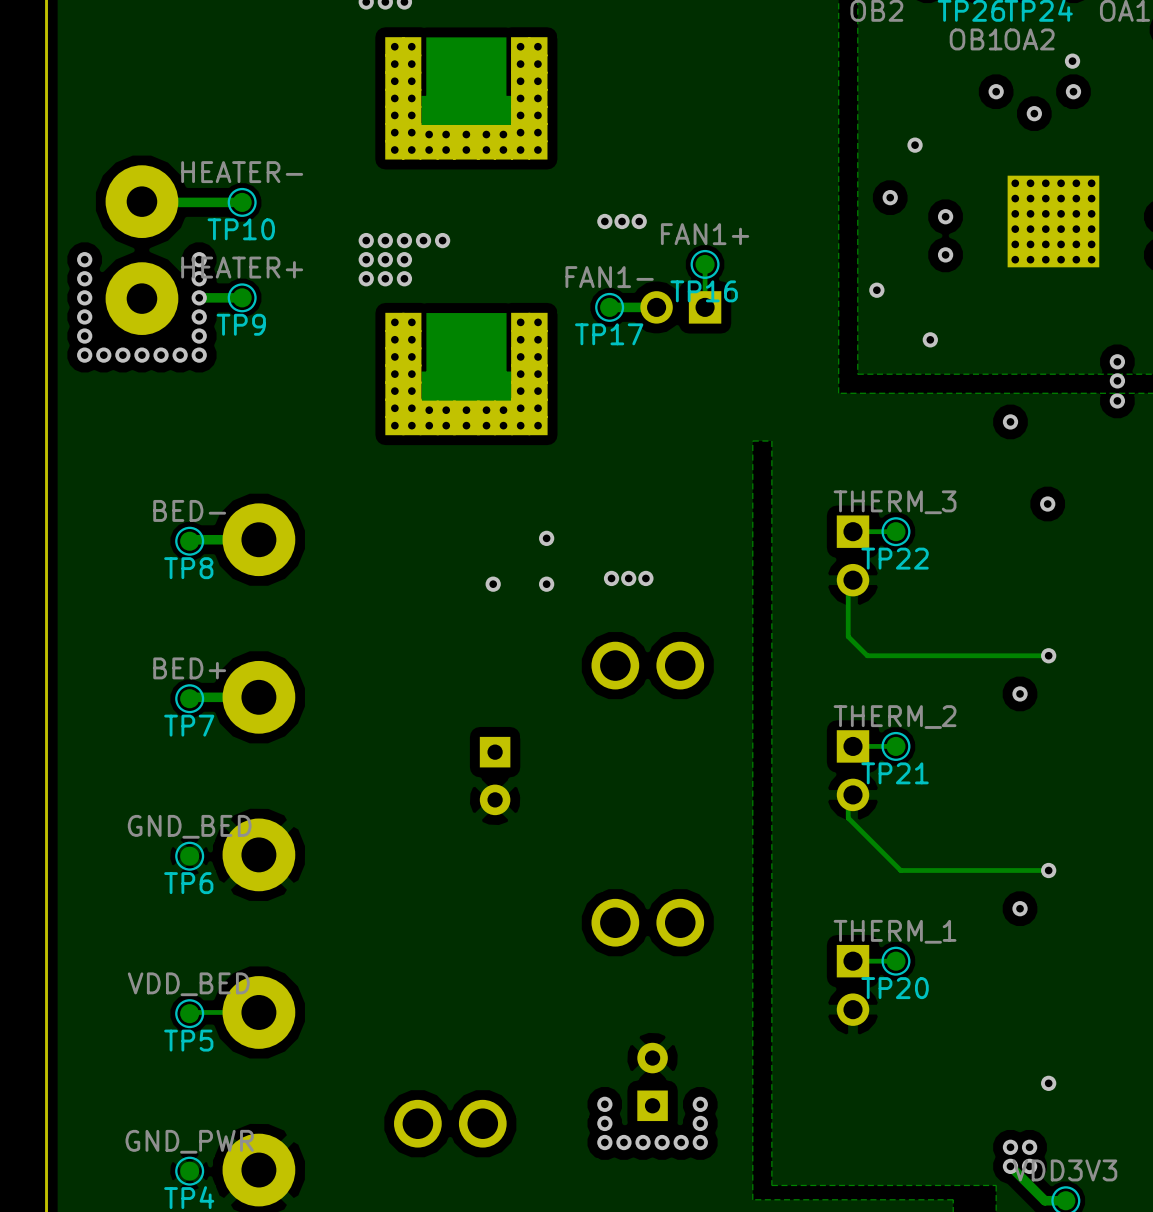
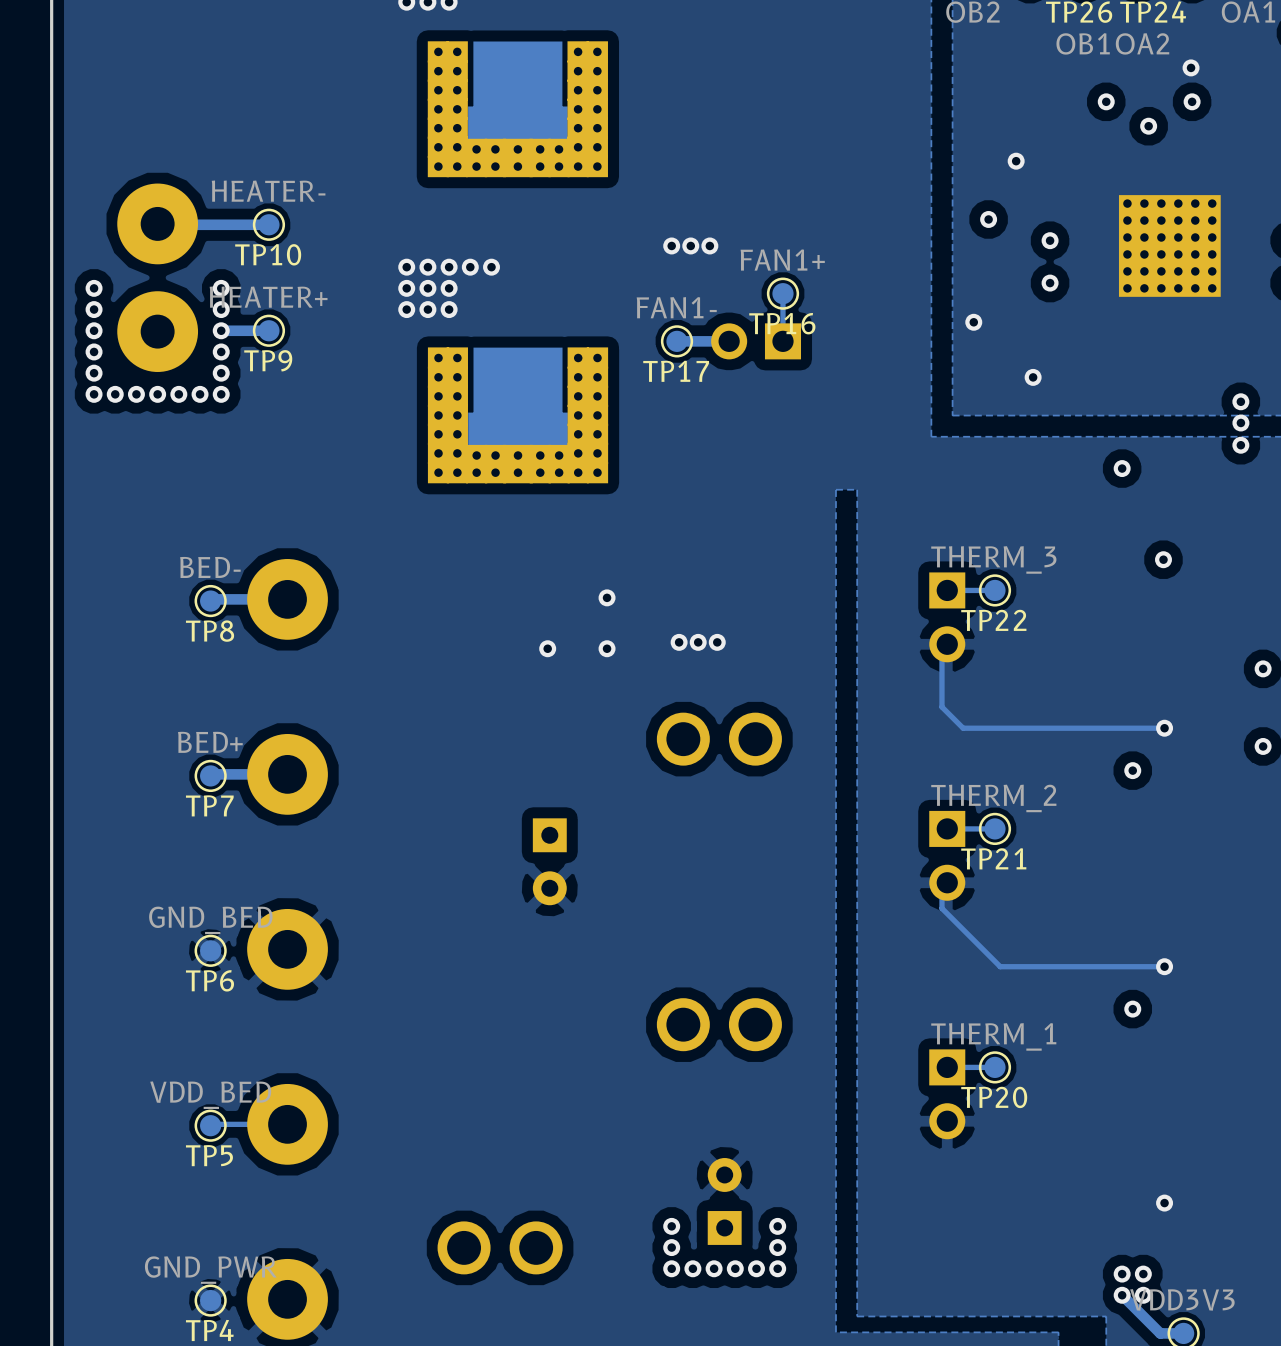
via: none -> (1263, 668)
via: none -> (1263, 746)

